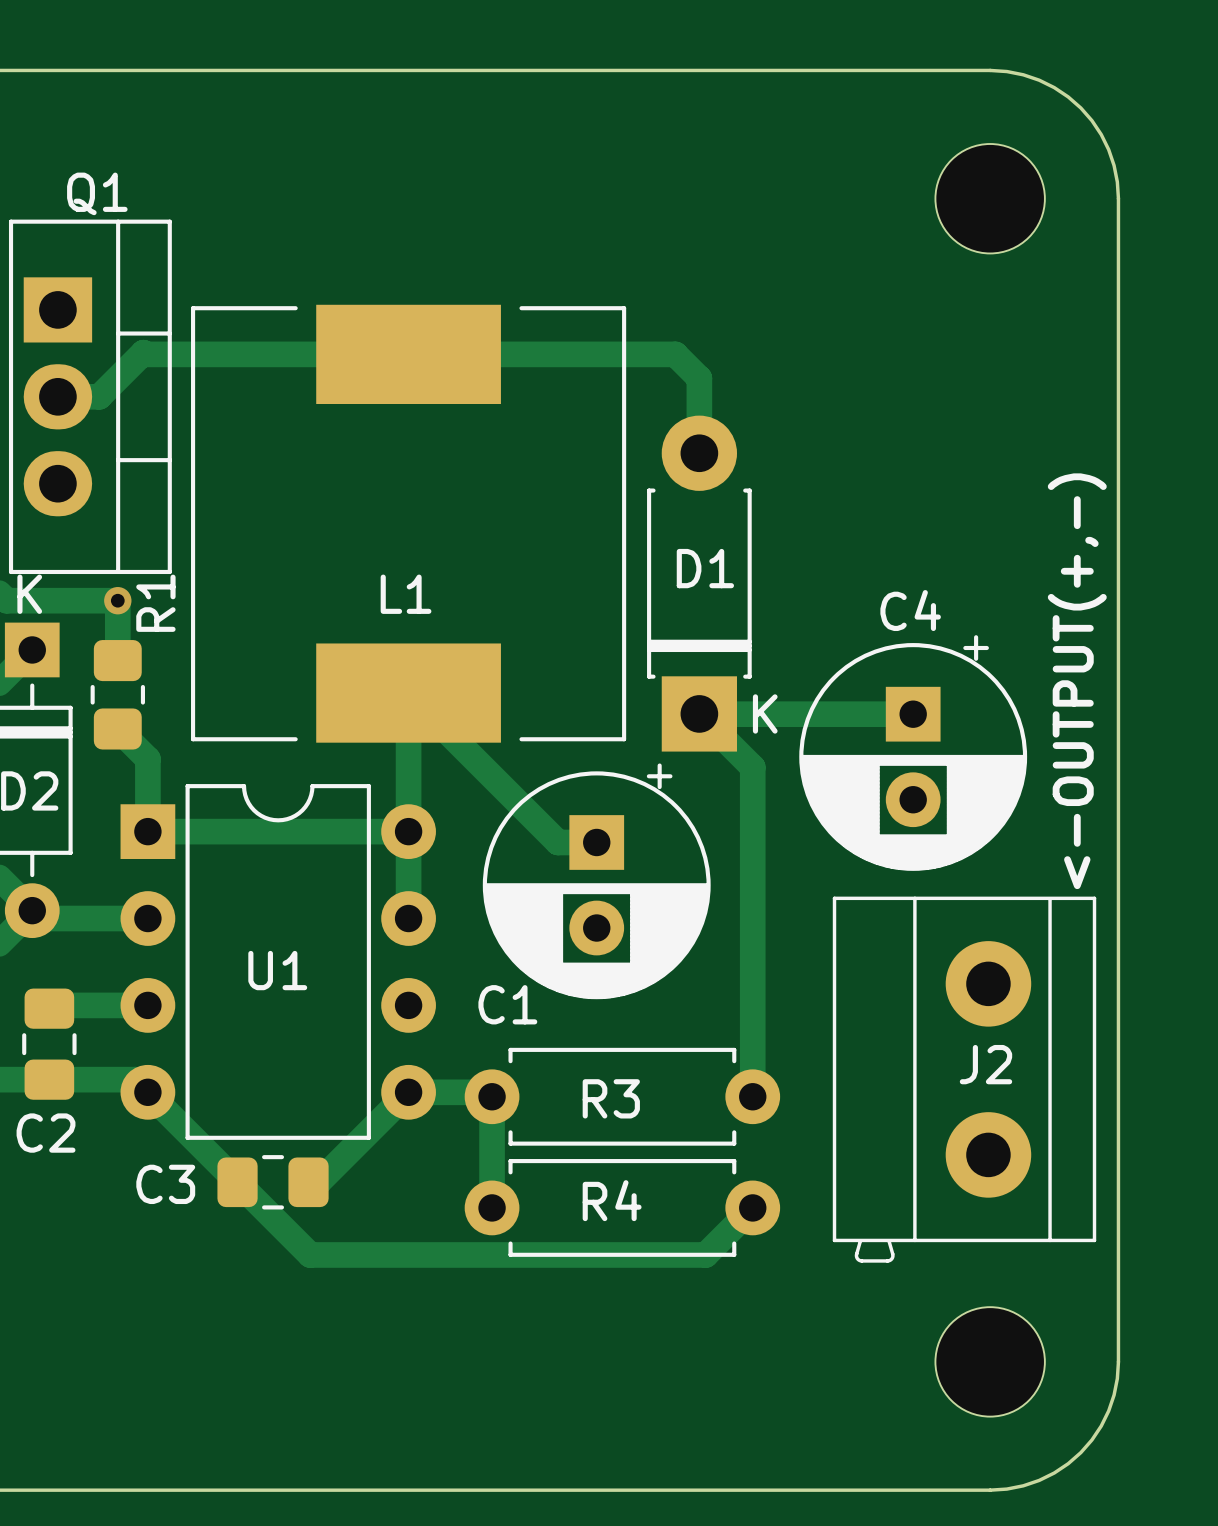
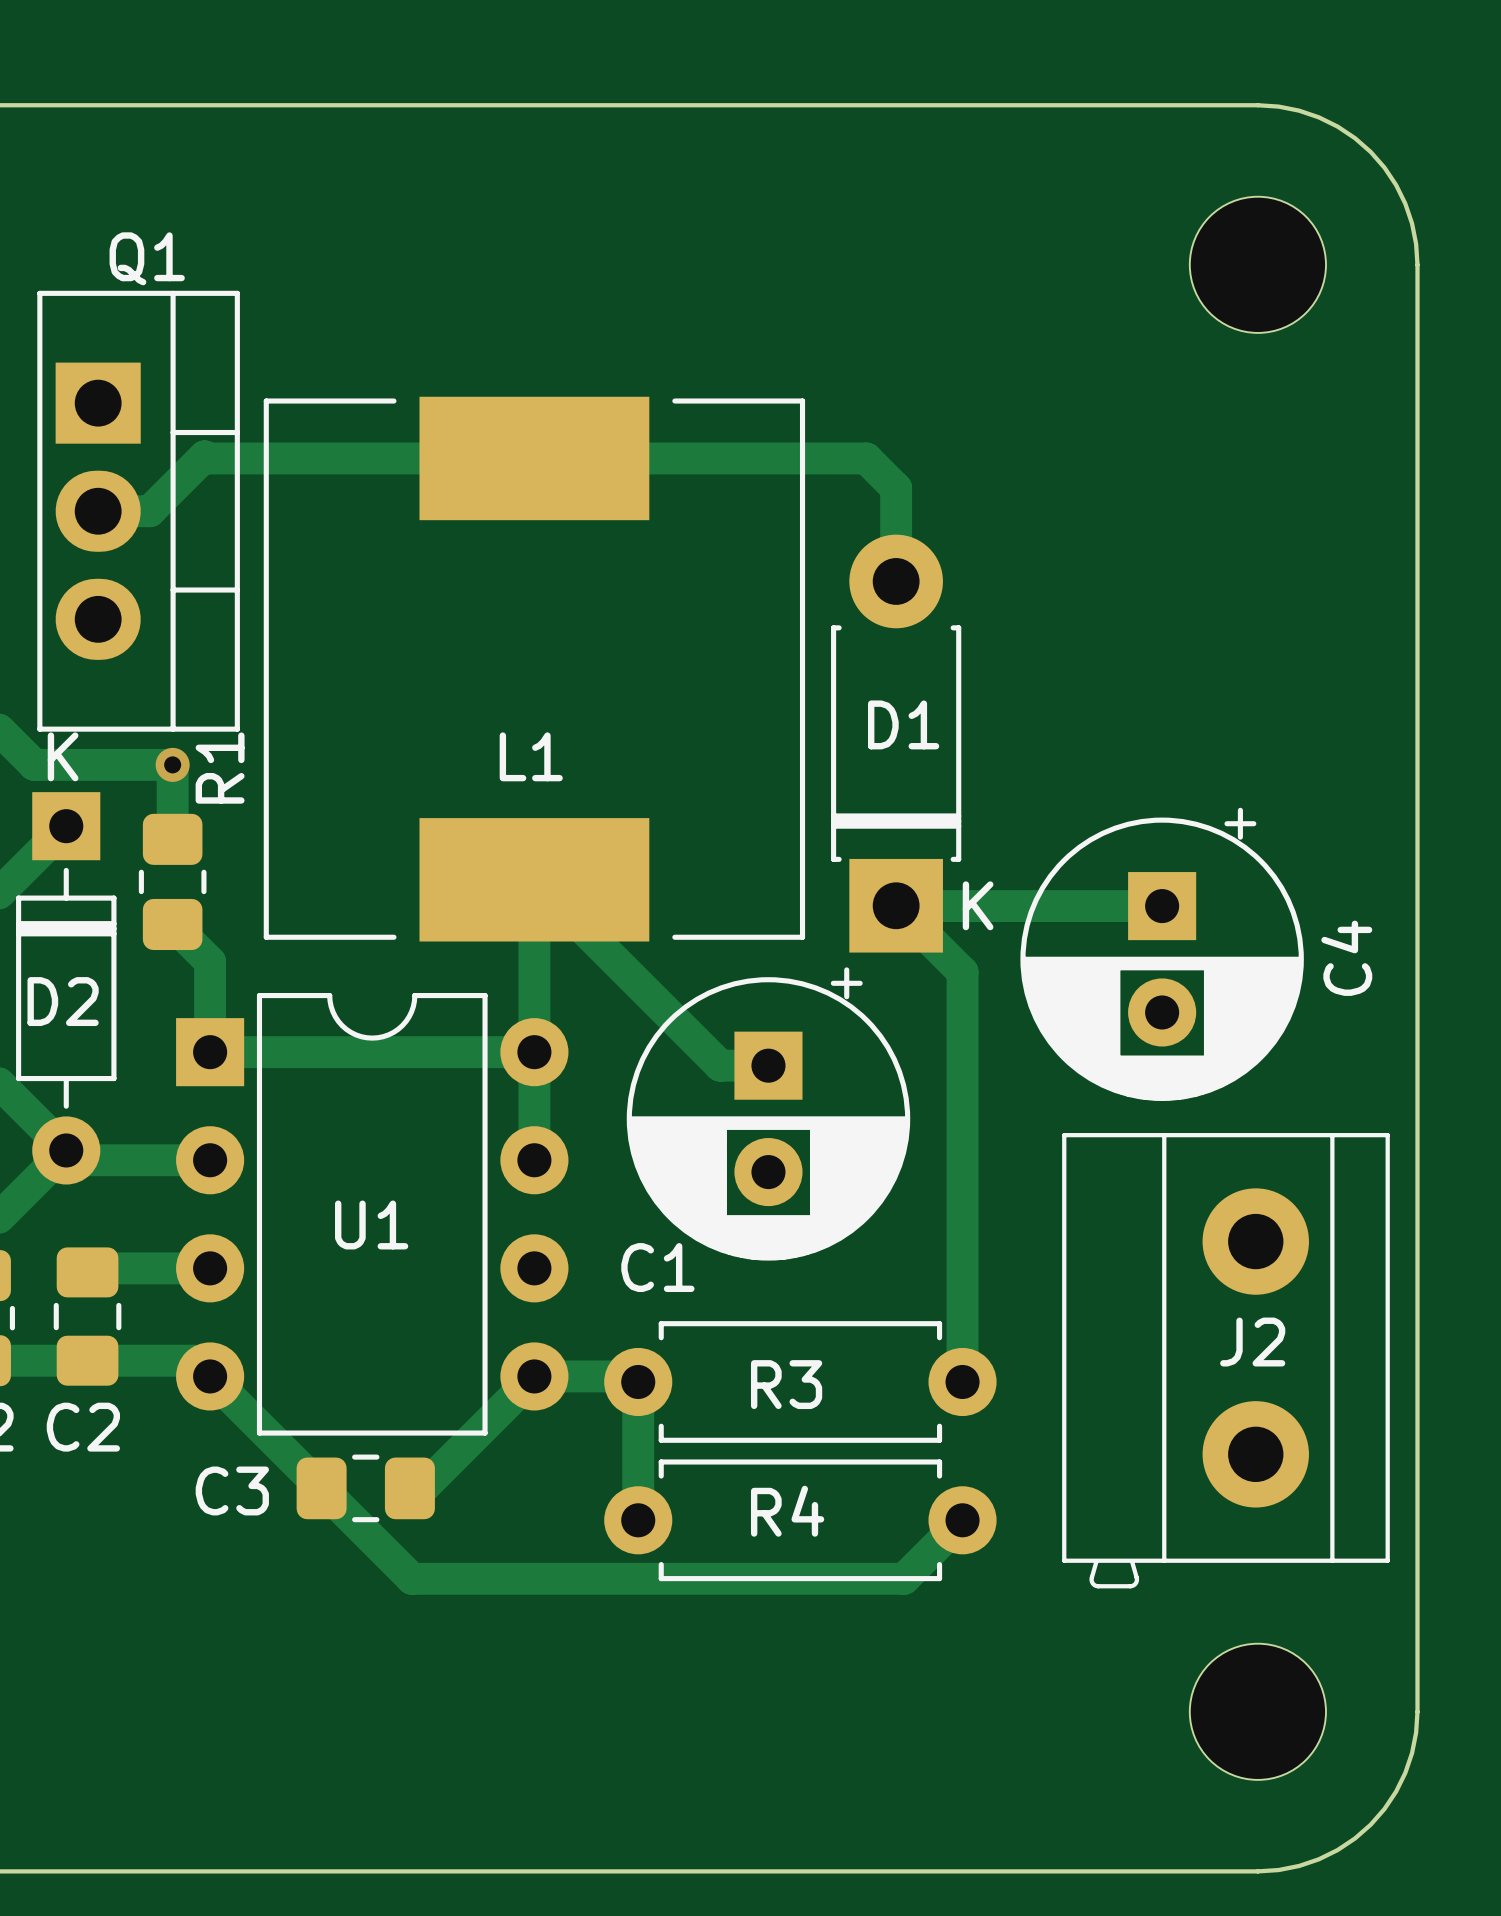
C4 name rotation: 0° (910, 610) -> 90° counterclockwise (1346, 958)
C4 name position: C4 (910, 610) -> C4 (1346, 958)
text: <-OUTPUT(+,-) (1077, 681) -> none

